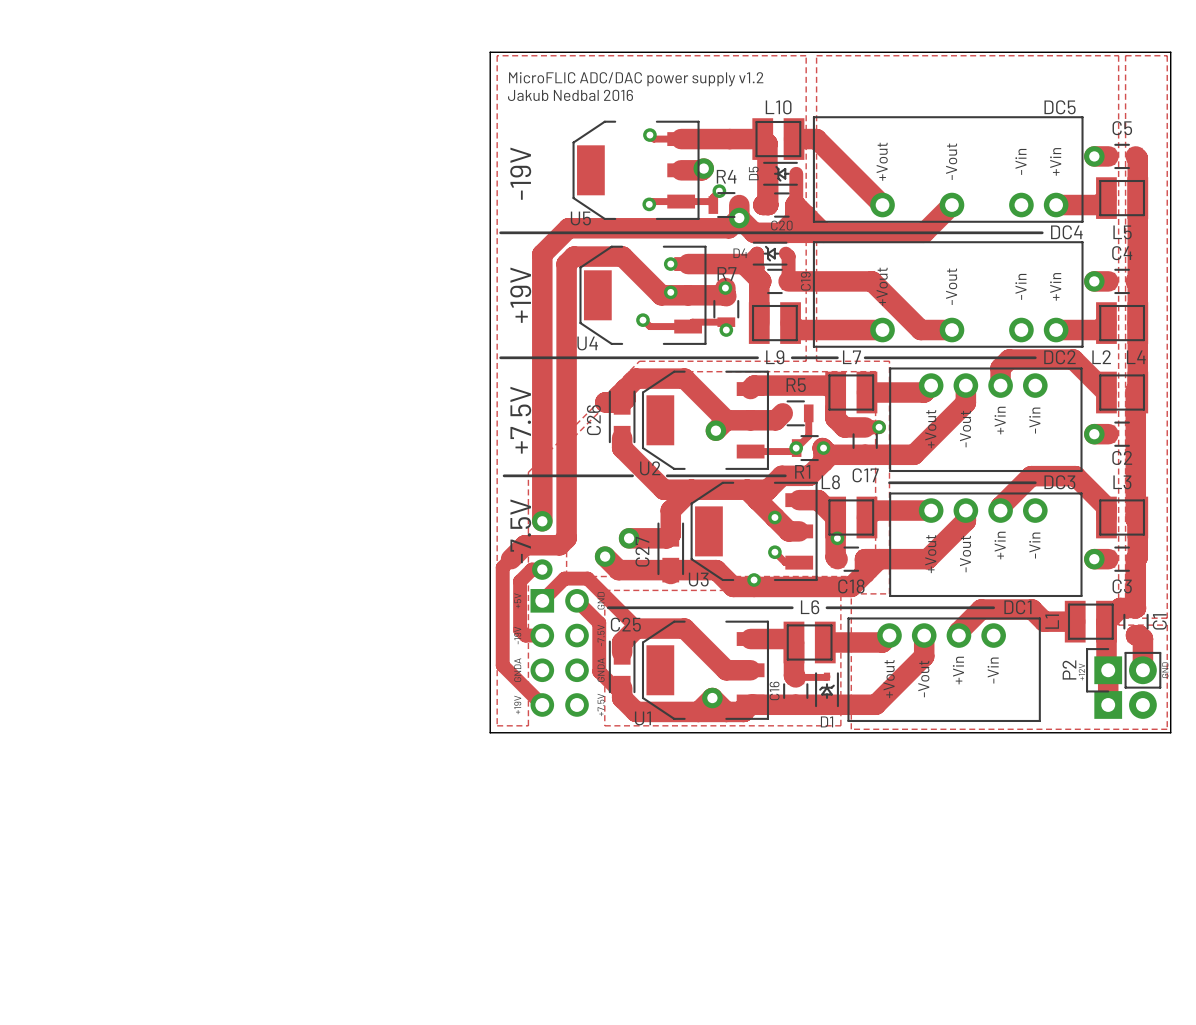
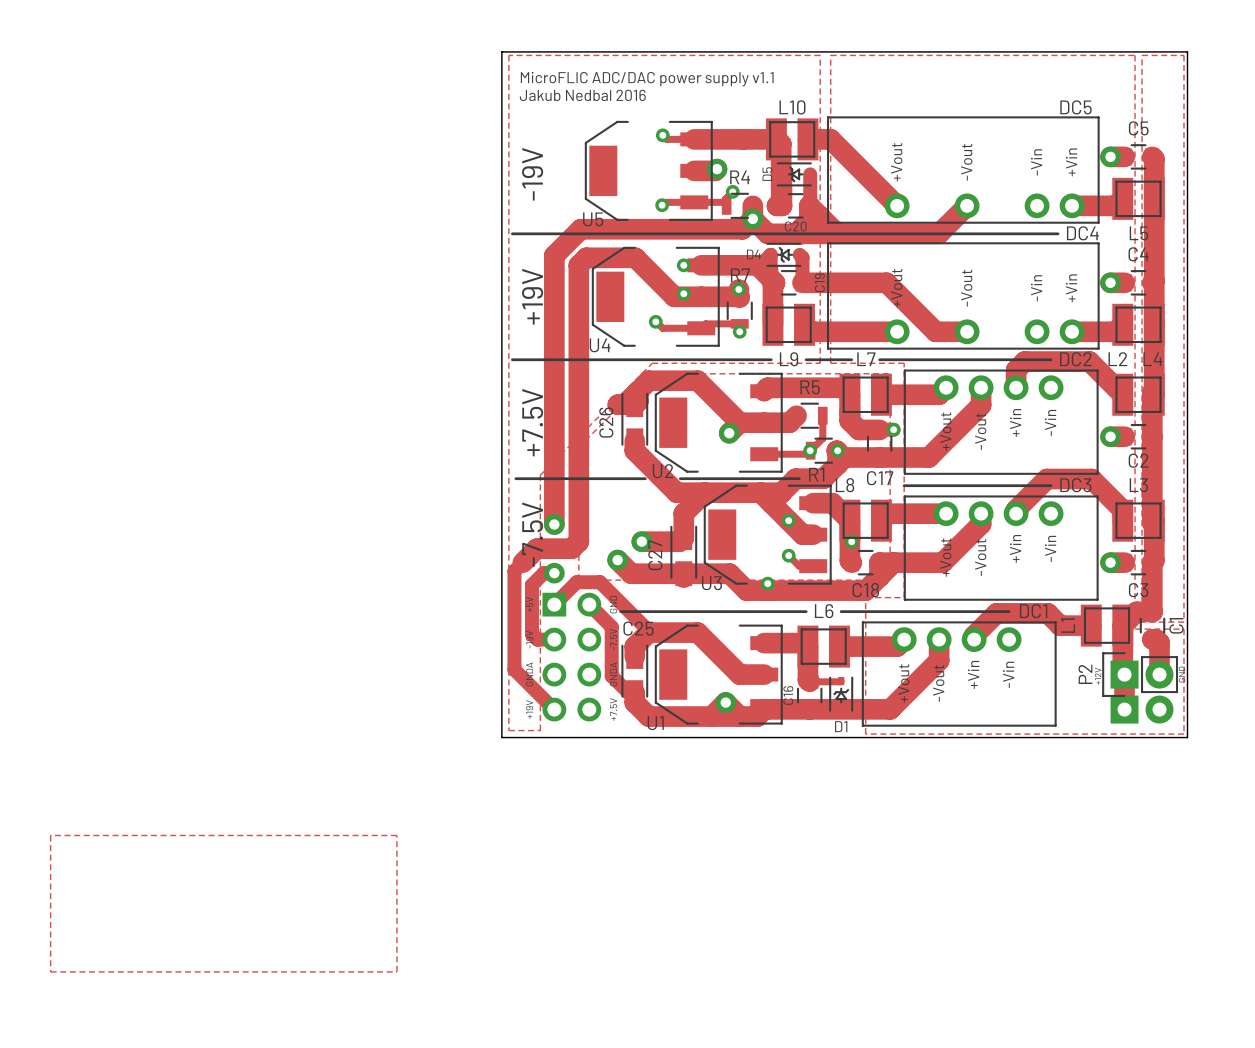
text: MicroFLIC ADC/DAC power supply v1.2 (636, 79) -> MicroFLIC ADC/DAC power supply v1.1 (647, 79)
zone outline: (604, 590) (840, 590) (840, 725) (604, 725) (604, 590) -> none
zone outline: none -> (50, 835) (396, 835) (396, 971) (50, 971) (50, 835)

